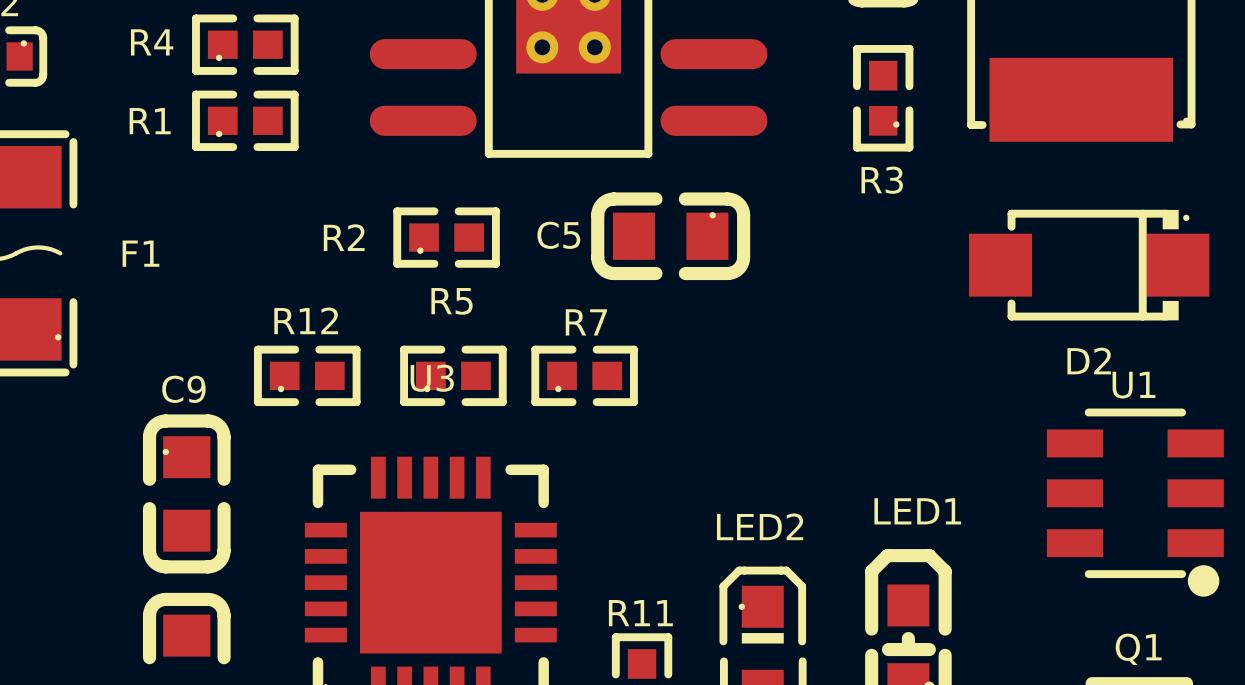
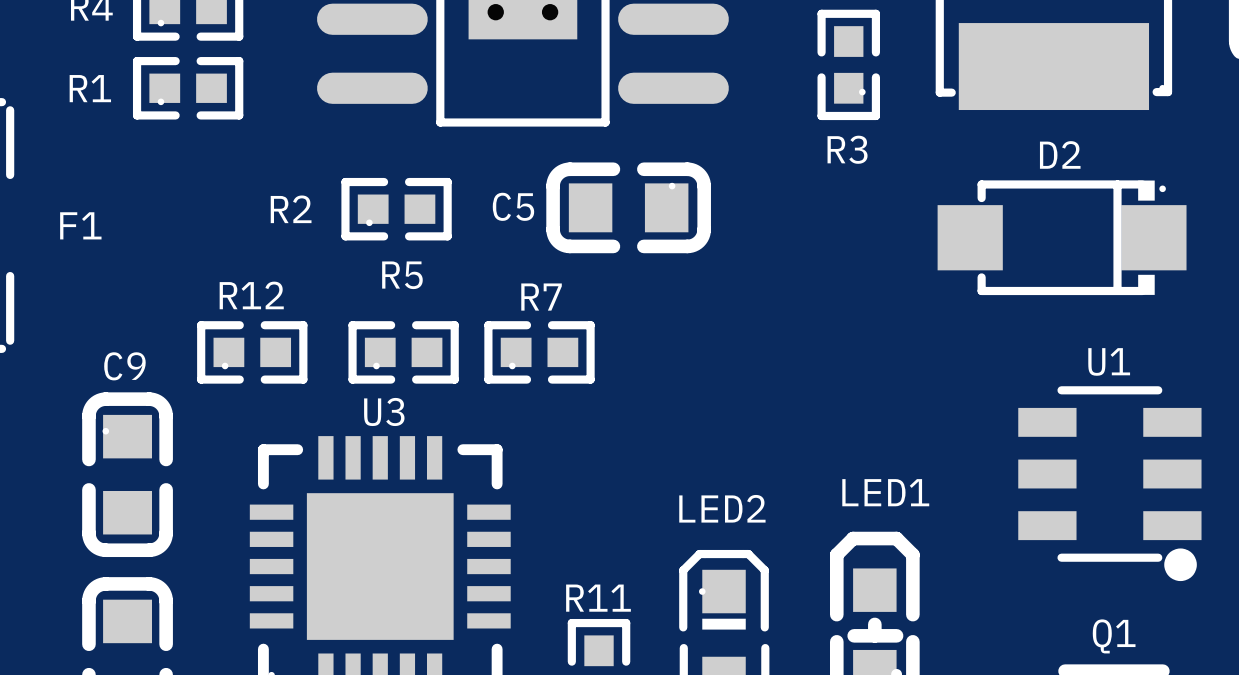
D2 name position: D2 (1089, 361) -> D2 (1060, 154)
U3 name position: U3 (432, 378) -> U3 (384, 411)

